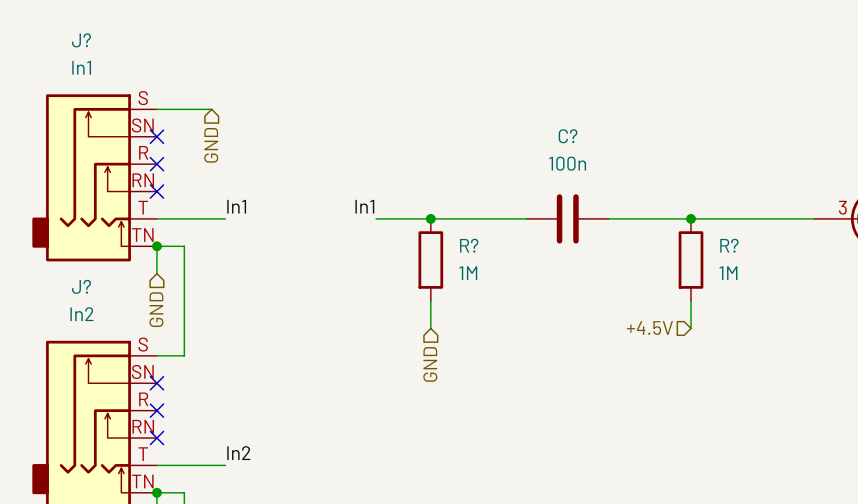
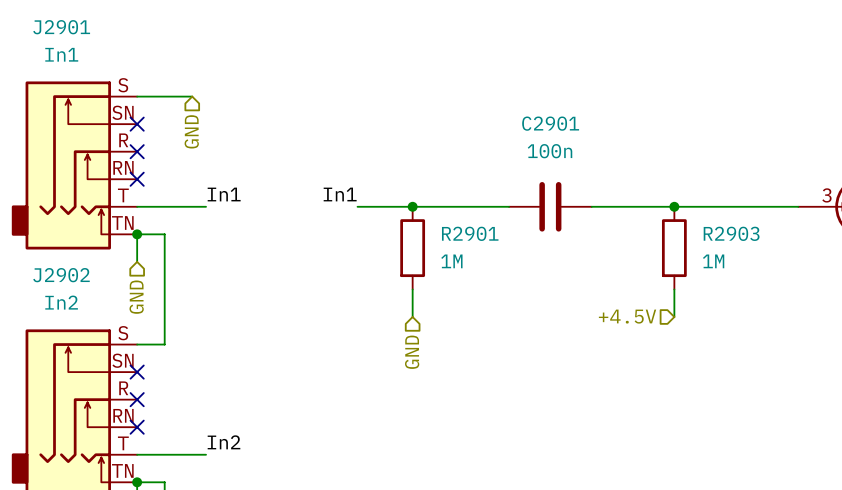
J? name: J? (81, 40) -> J2901 (61, 27)
C? name: C? (568, 136) -> C2901 (550, 123)
R? name: R? (469, 245) -> R2901 (470, 233)
R? name: R? (729, 245) -> R2903 (731, 233)
J? name: J? (81, 286) -> J2902 (61, 275)

